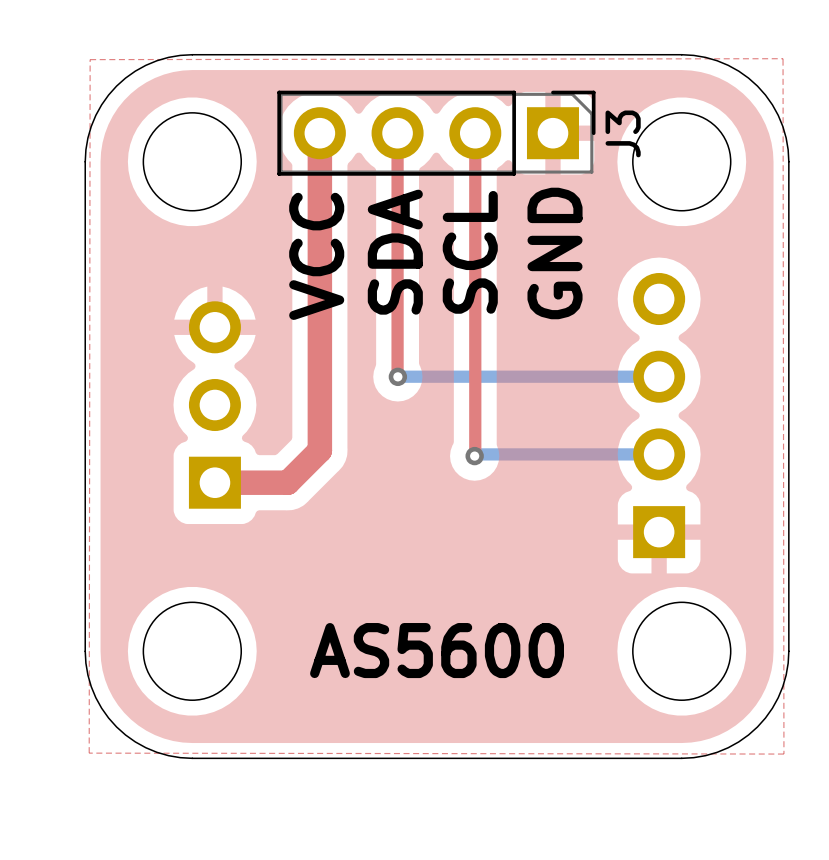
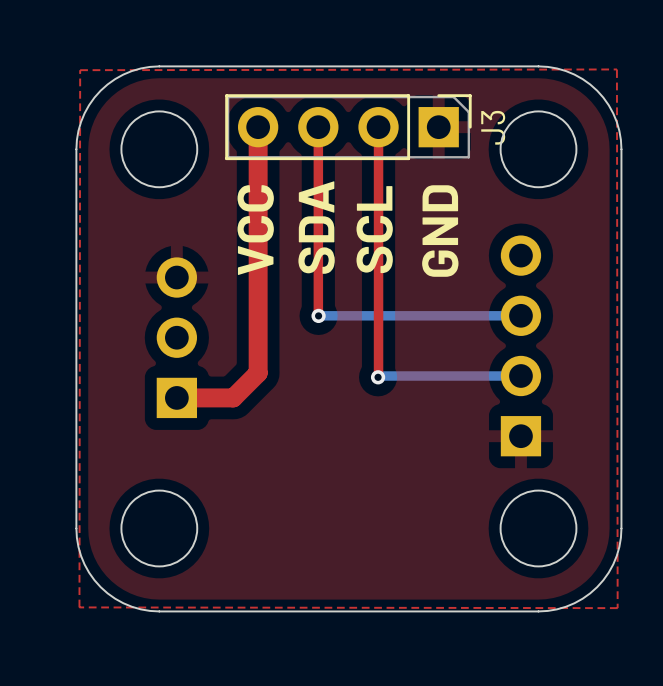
text: AS5600 (437, 650) -> none

